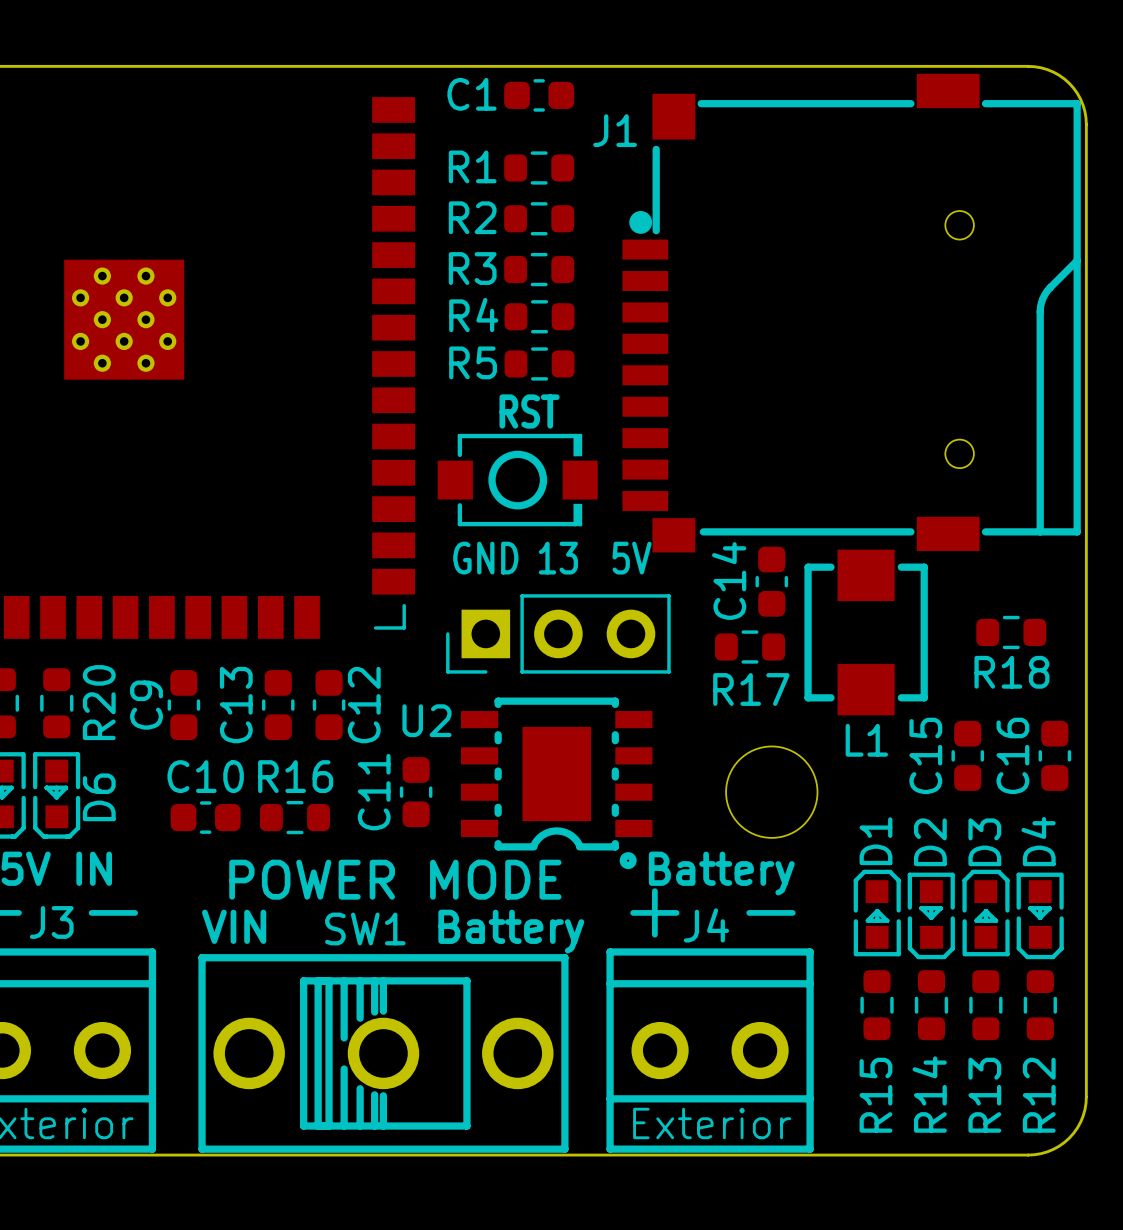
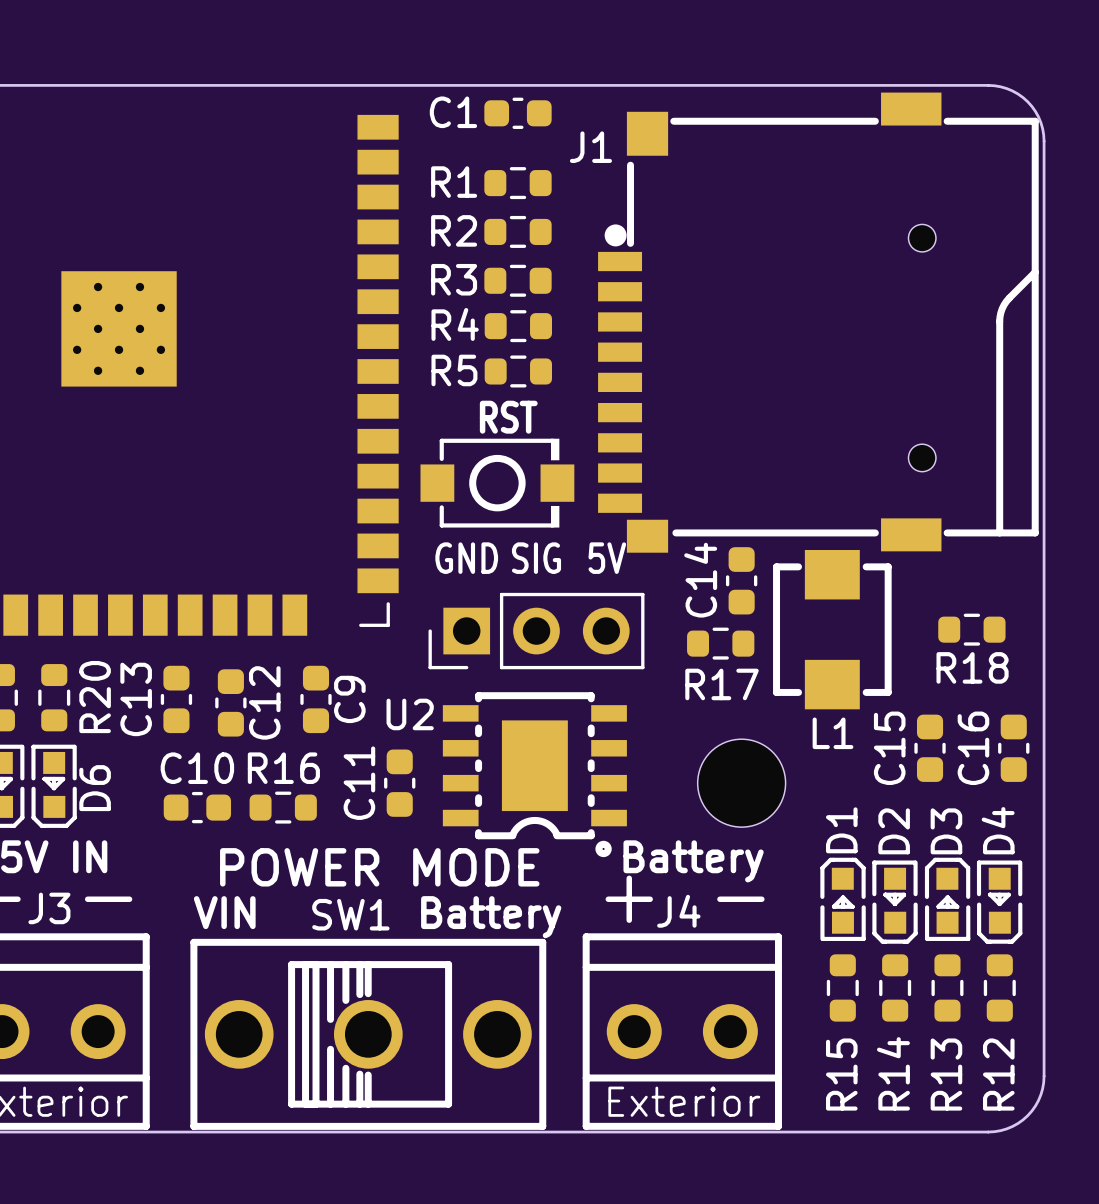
part text: 13 (558, 558) -> SIG (536, 558)
C9 name: C9 (146, 705) -> C13 (136, 699)
C13: (278, 705) -> none
C12 name: C12 (364, 705) -> C9 (349, 699)
C12: none -> (230, 702)

